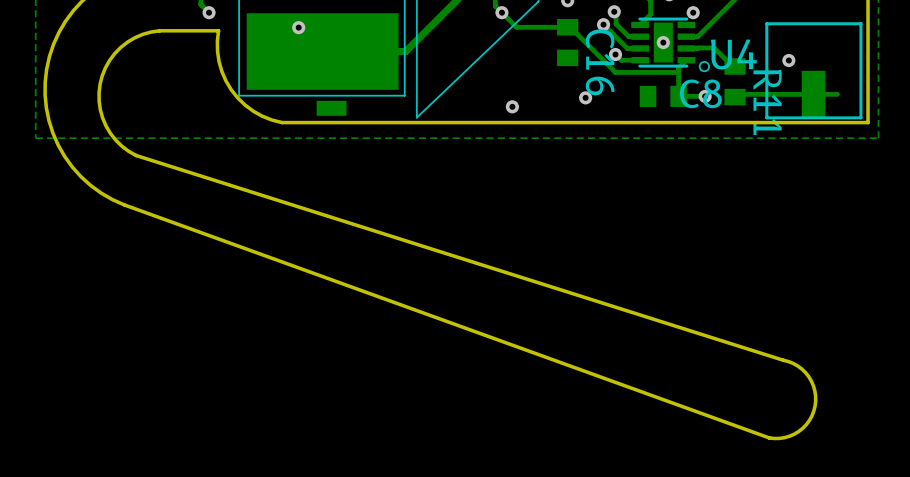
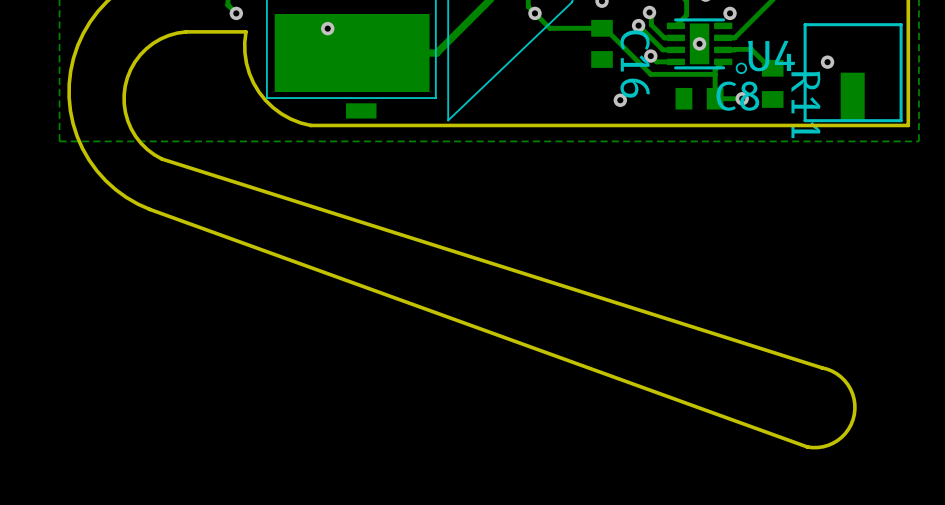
track: (837, 94) (737, 94) -> none
via: (512, 106) -> none

